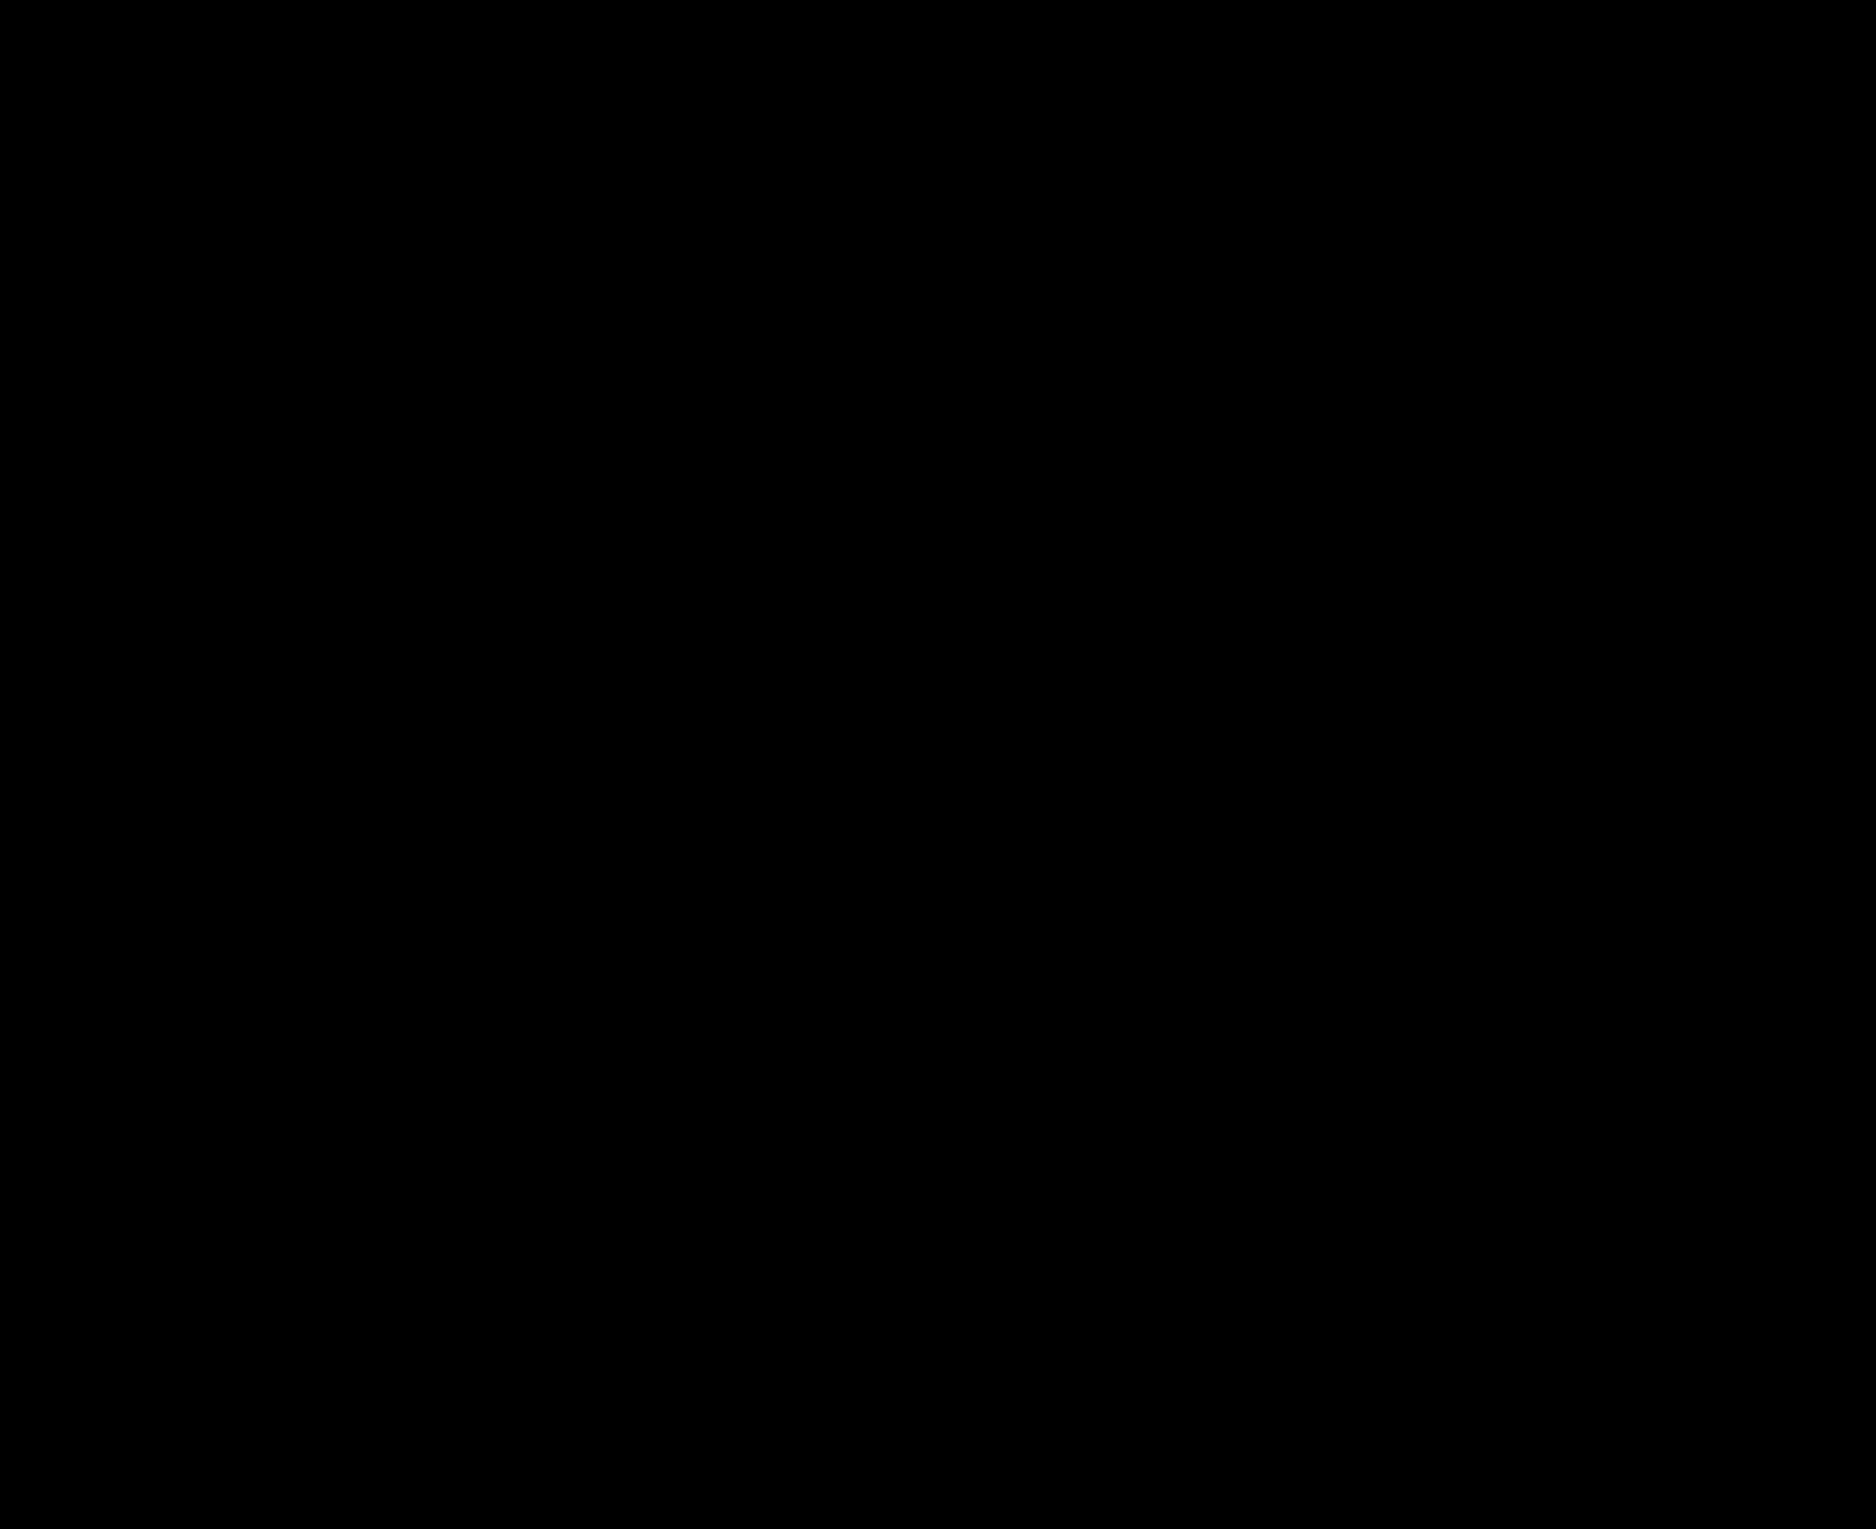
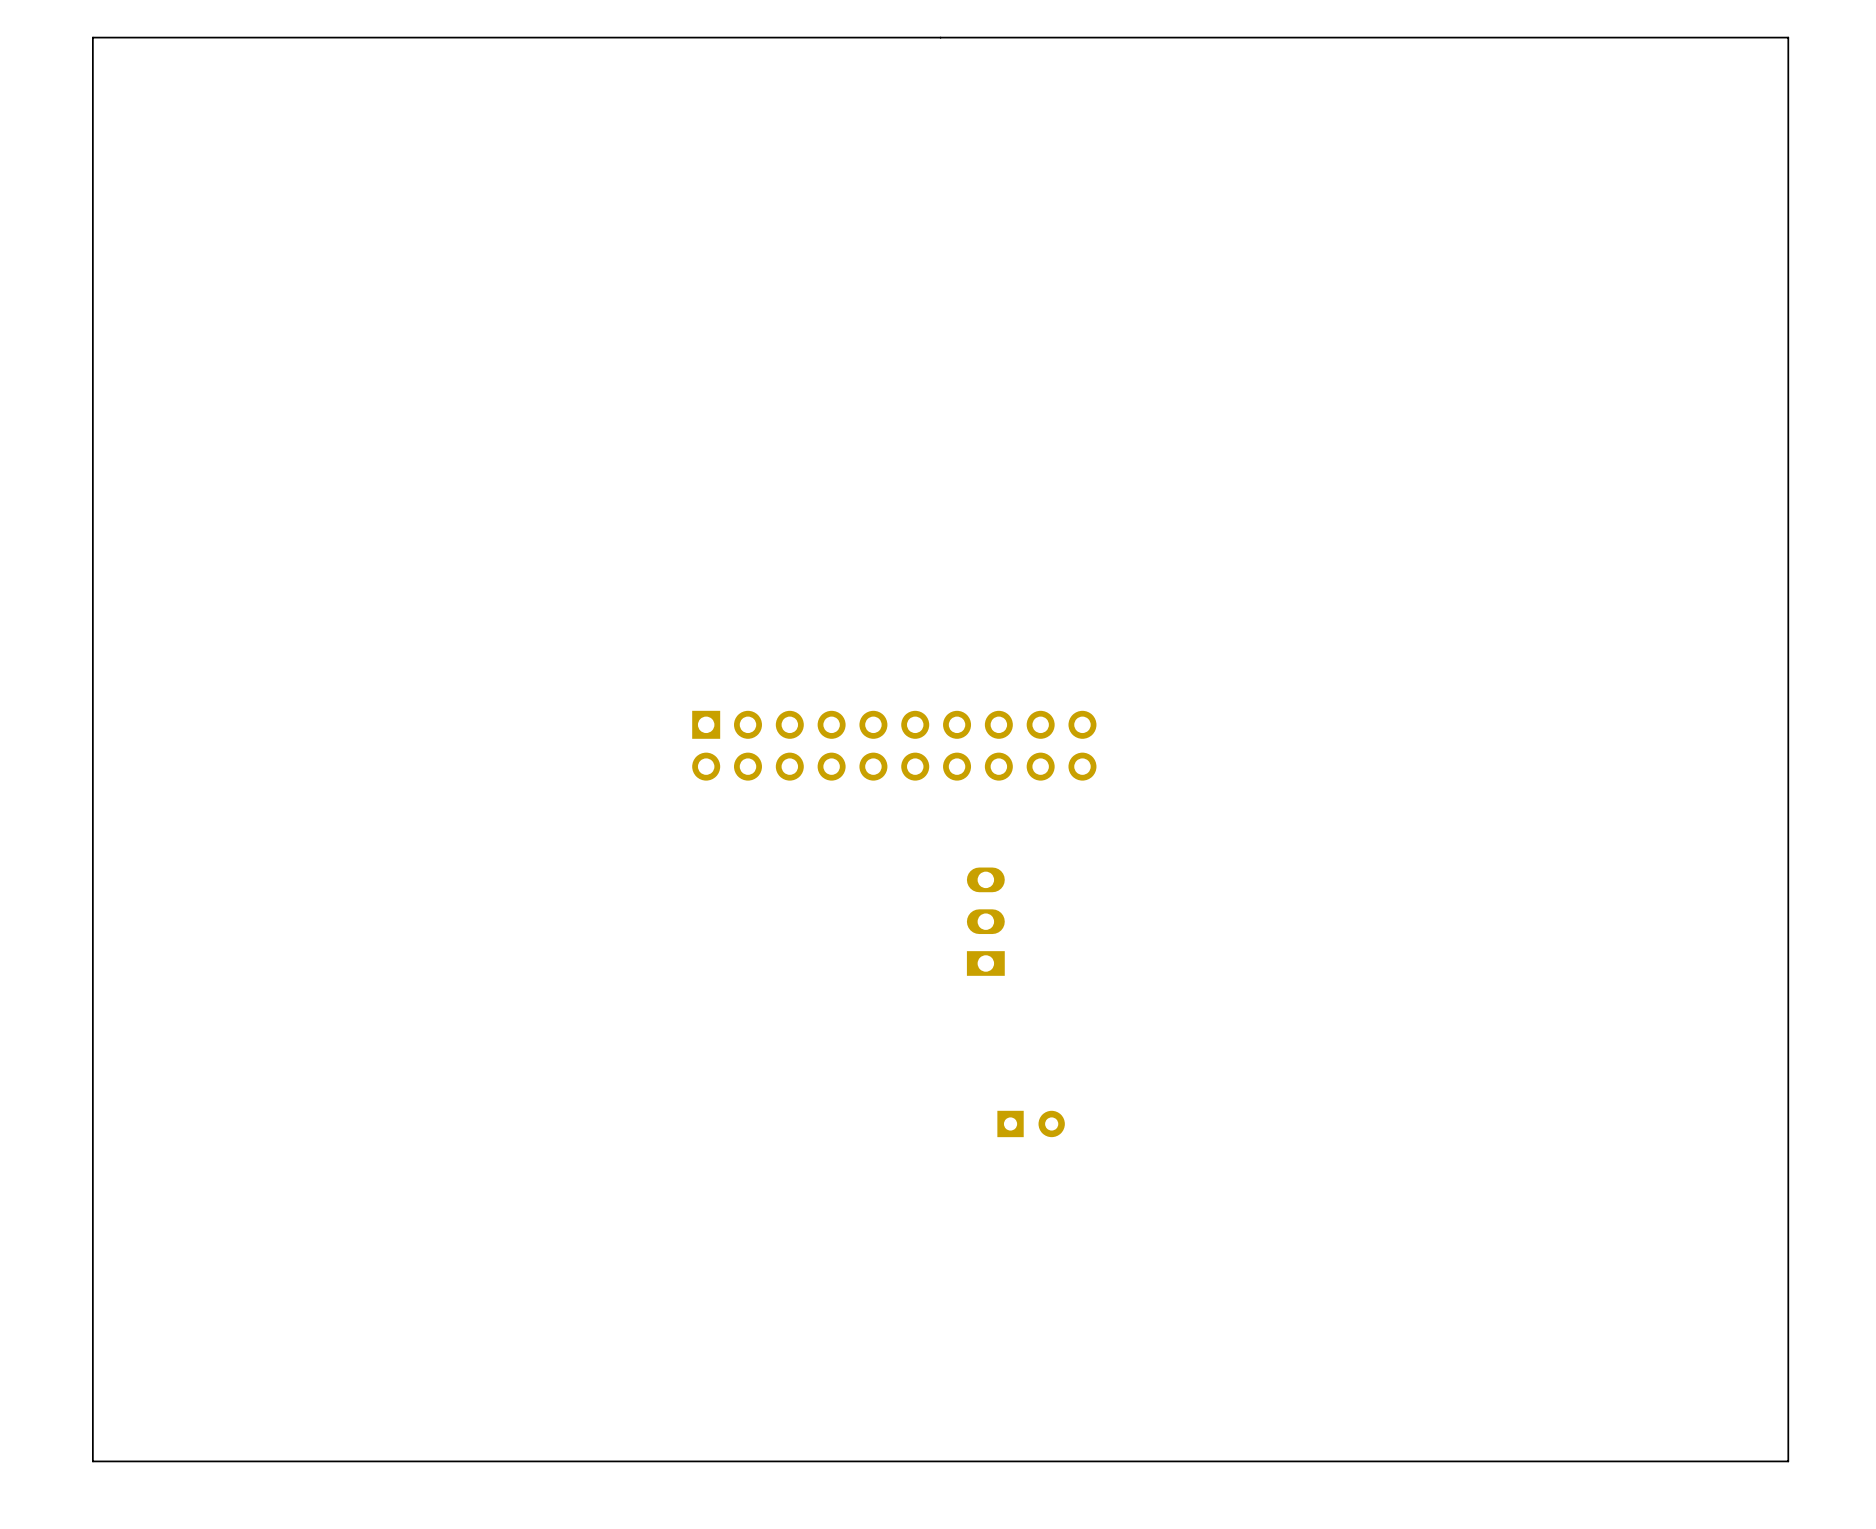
board edge: none -> (1788, 37) (92, 37) (92, 1461) (1788, 1461) (1788, 37)
part: none -> (894, 745)
part: none -> (985, 921)
part: none -> (1031, 1123)

